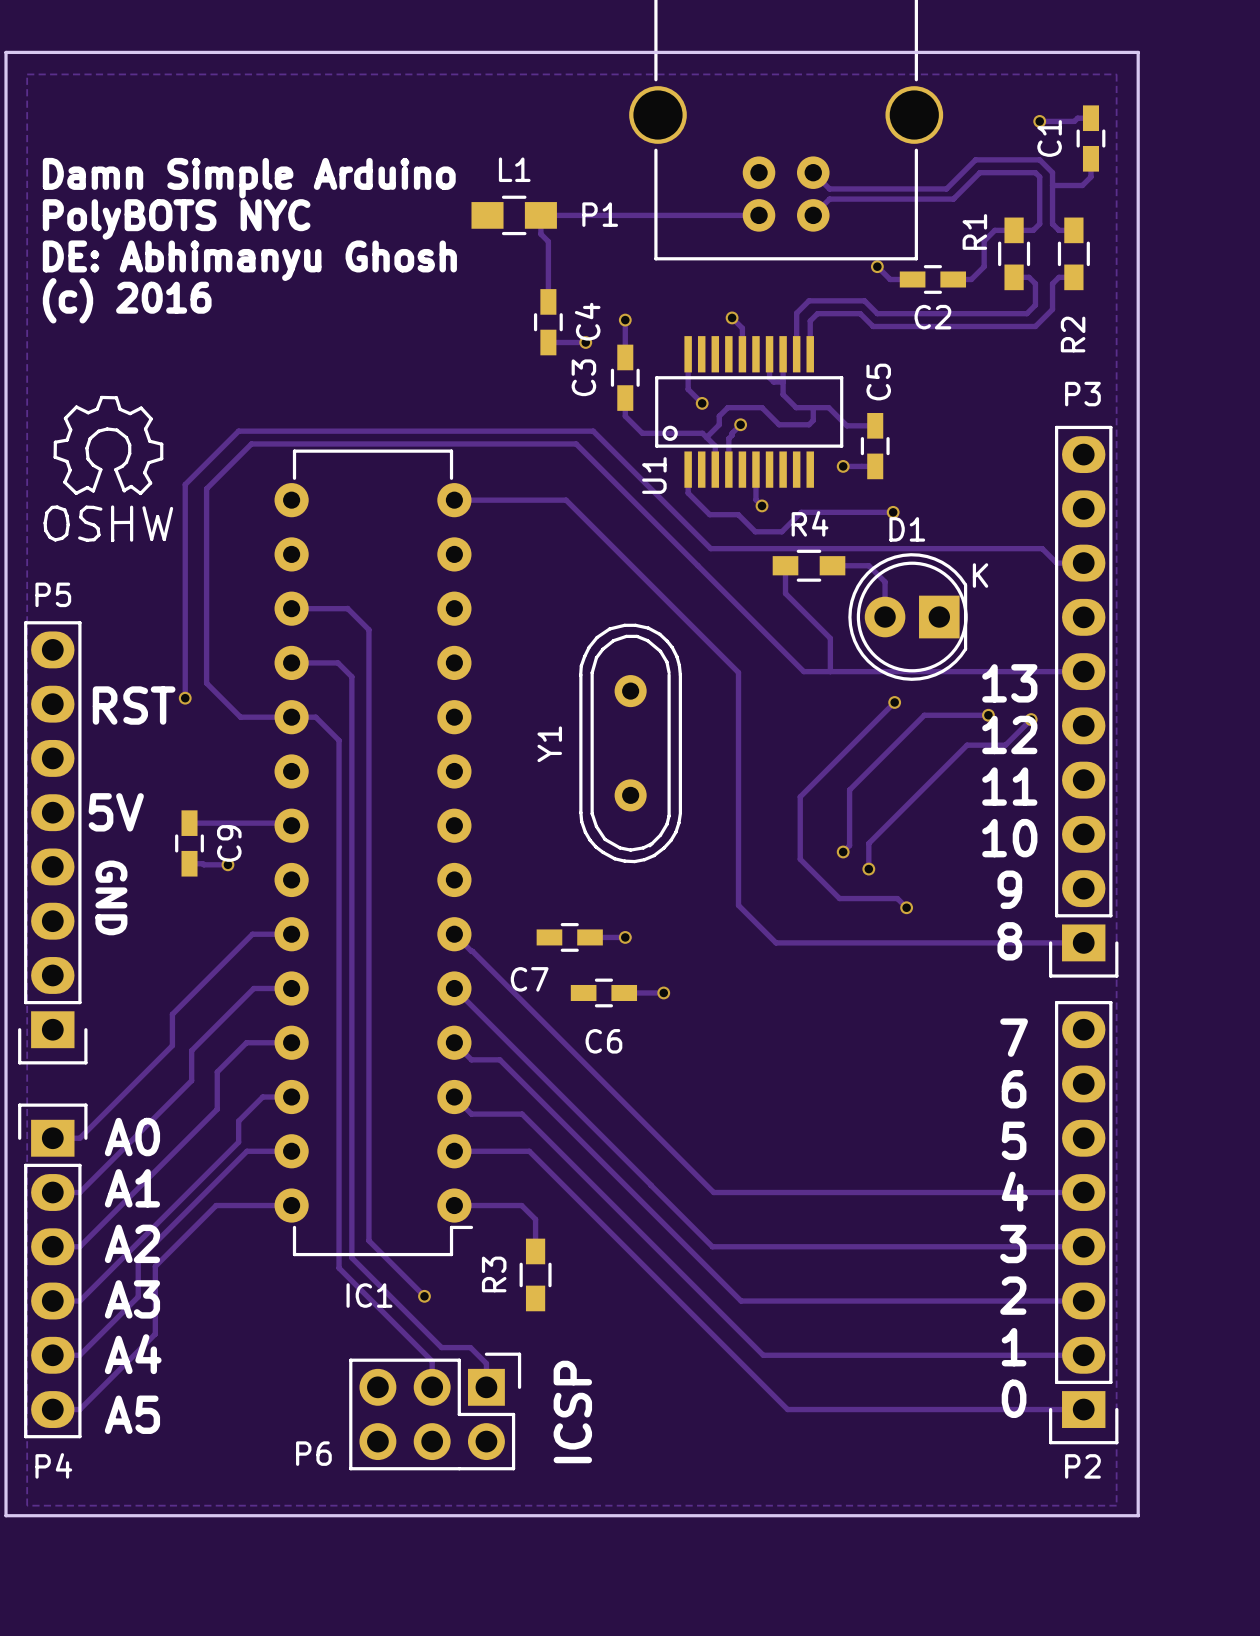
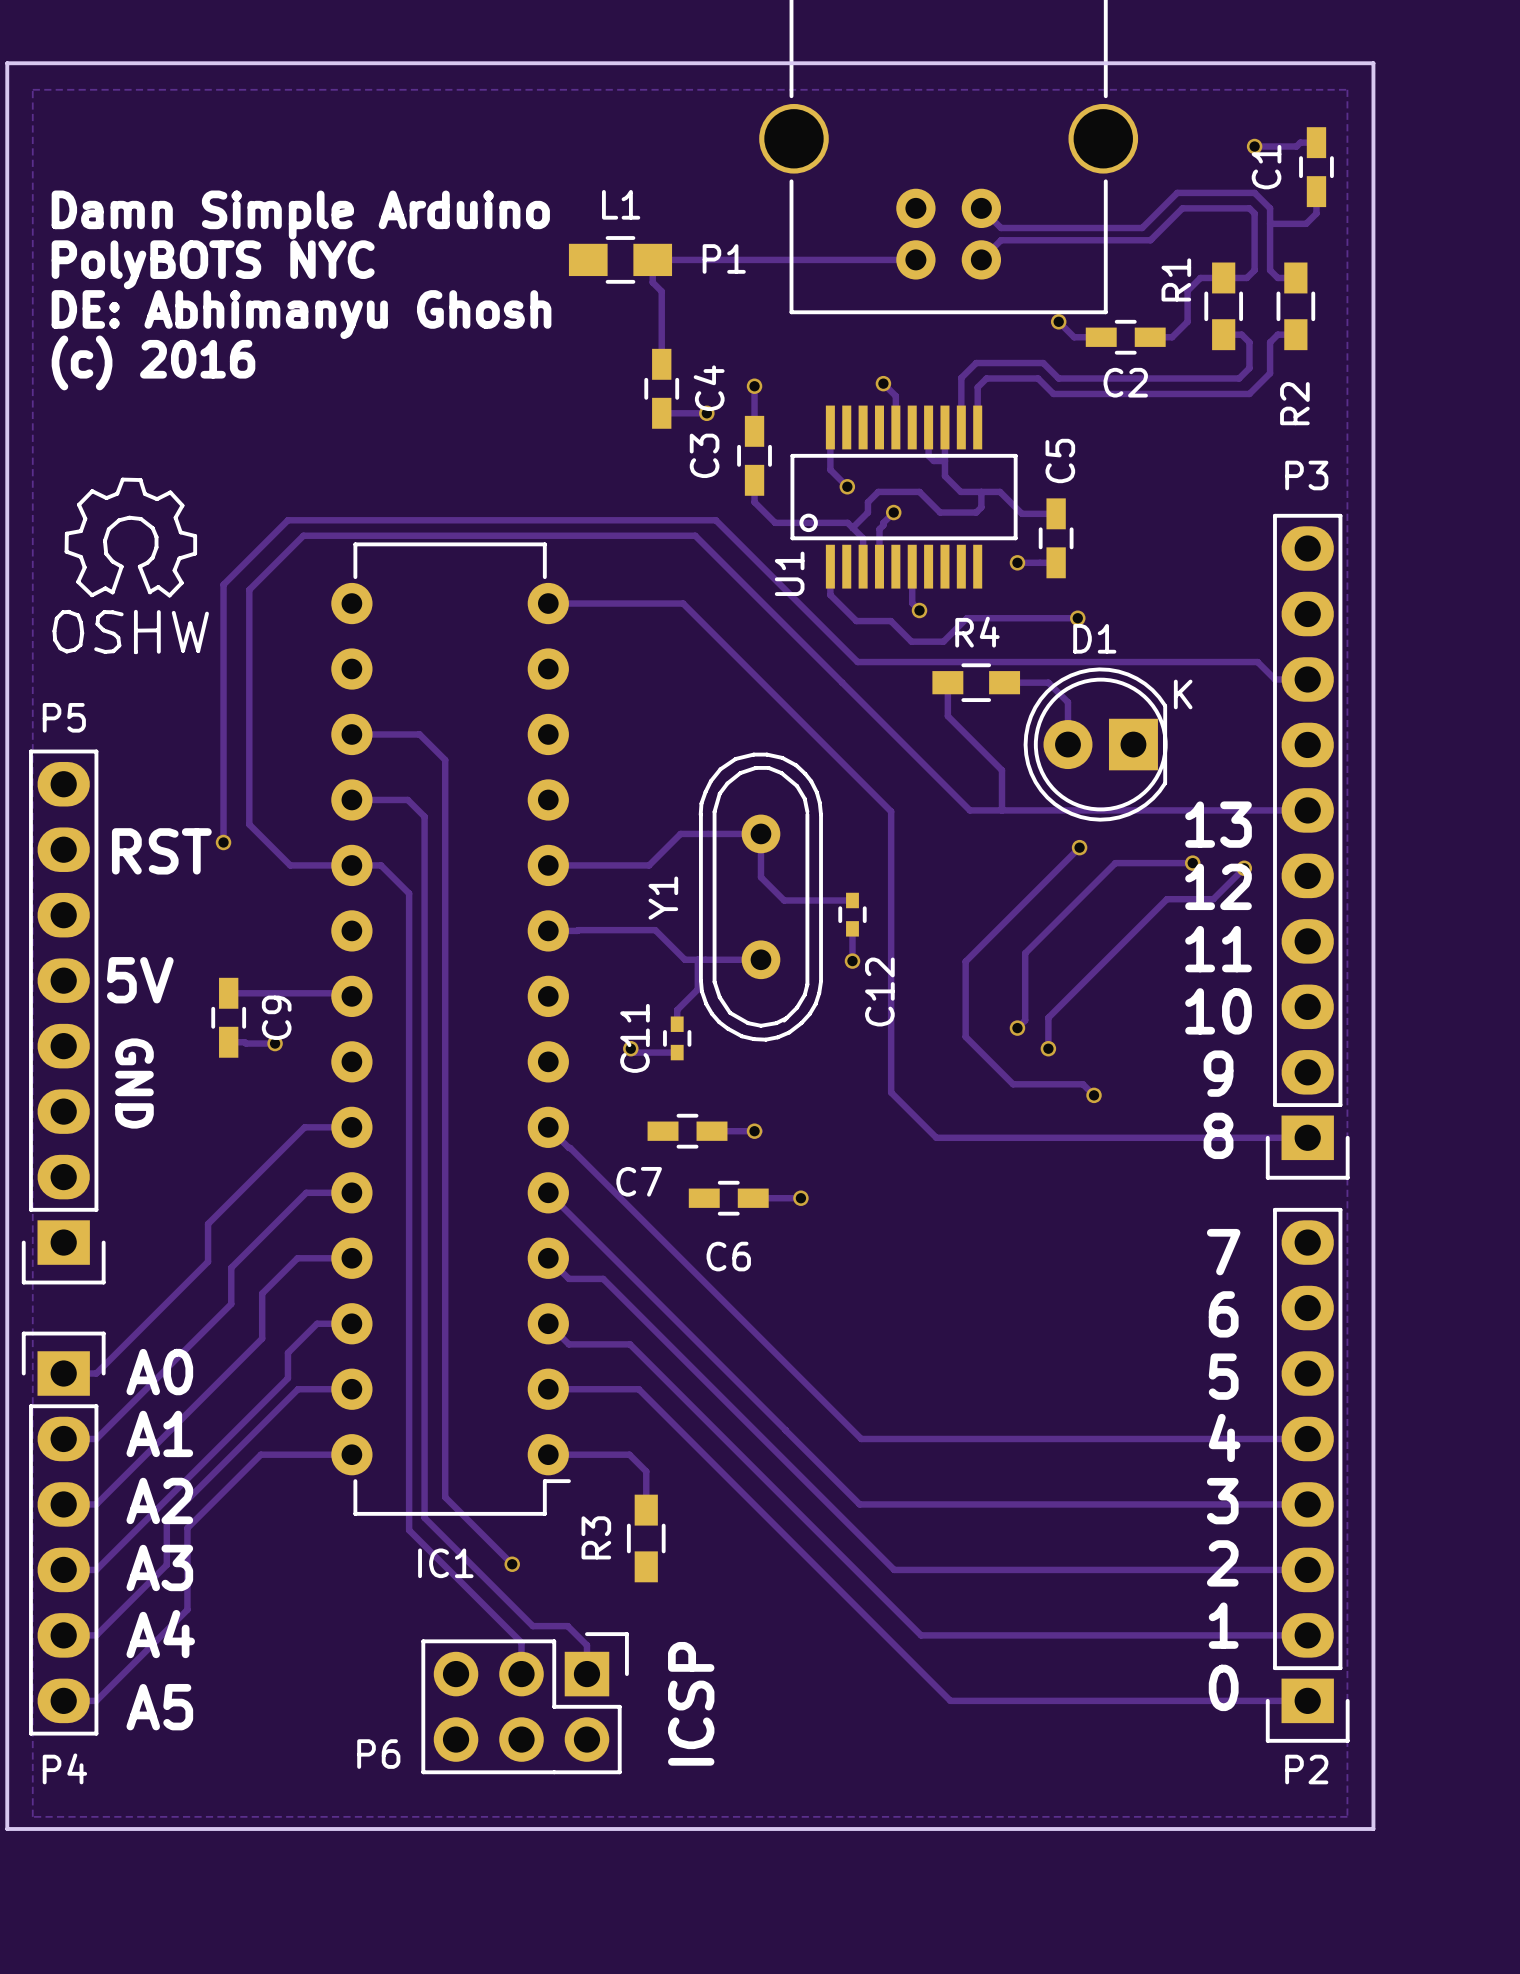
track: none -> (548, 865) (649, 865) (680, 833) (760, 833) (760, 877) (784, 900) (852, 900)
C12: none -> (852, 914)
track: none -> (852, 928) (852, 961)
track: none -> (548, 930) (655, 930) (684, 959) (760, 959)
track: none -> (697, 959) (697, 989) (677, 1010) (677, 1024)
via: none -> (852, 961)
C11: none -> (677, 1038)
track: none -> (630, 1048) (634, 1052) (677, 1052)
via: none -> (630, 1048)

